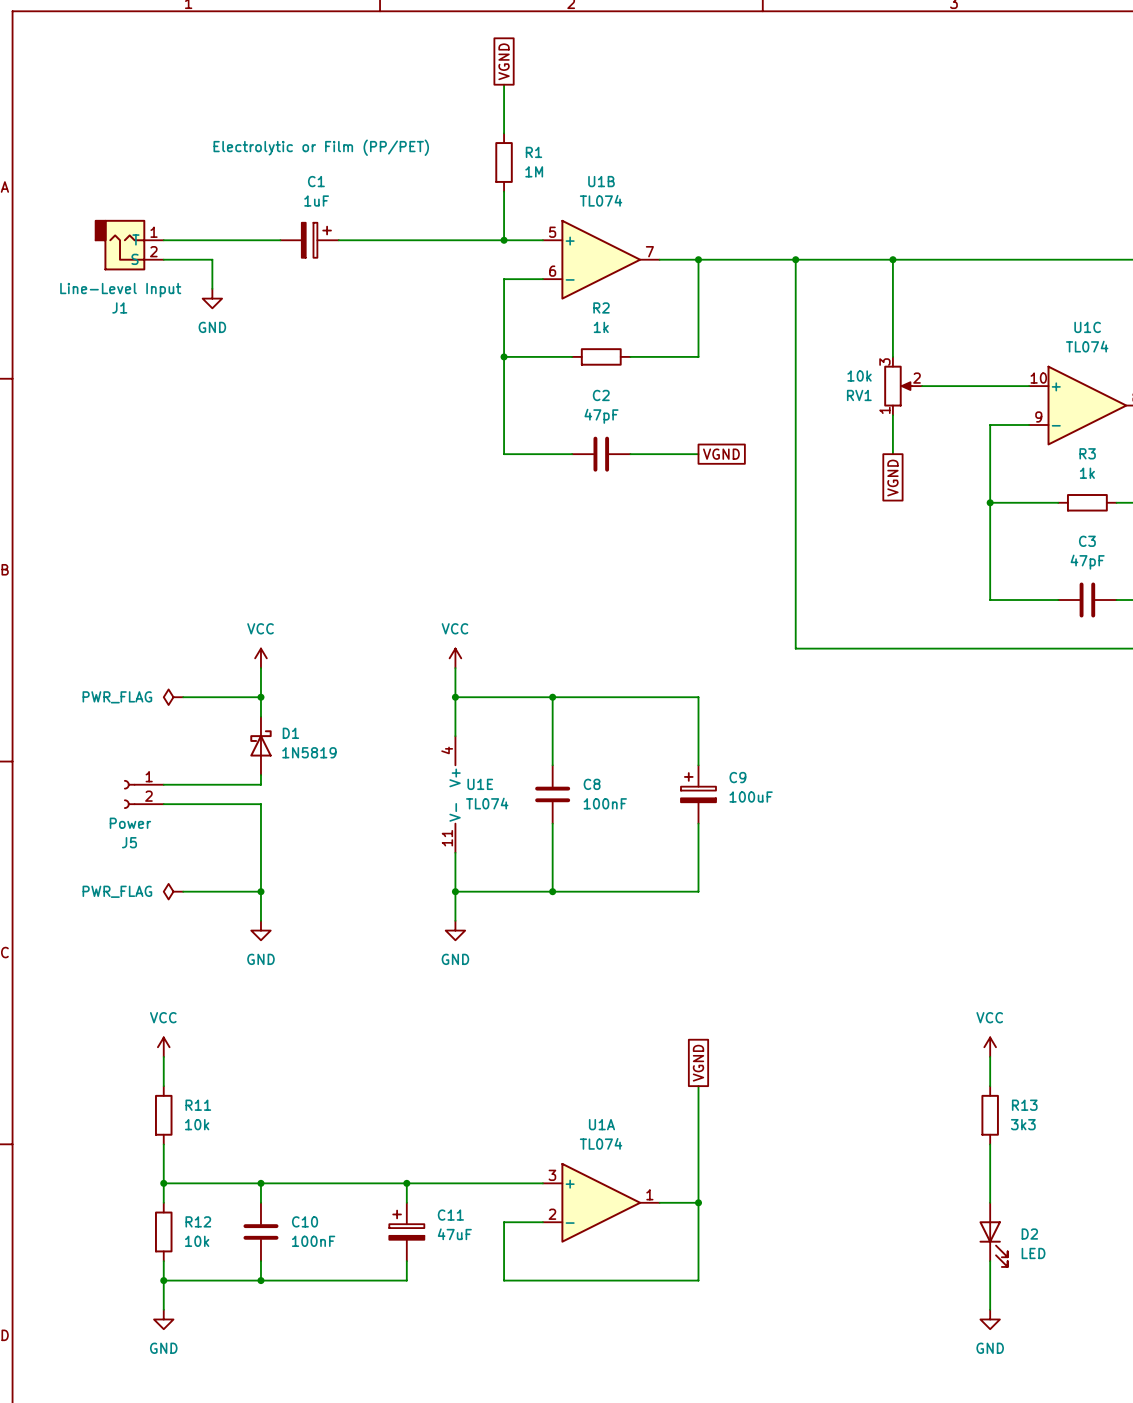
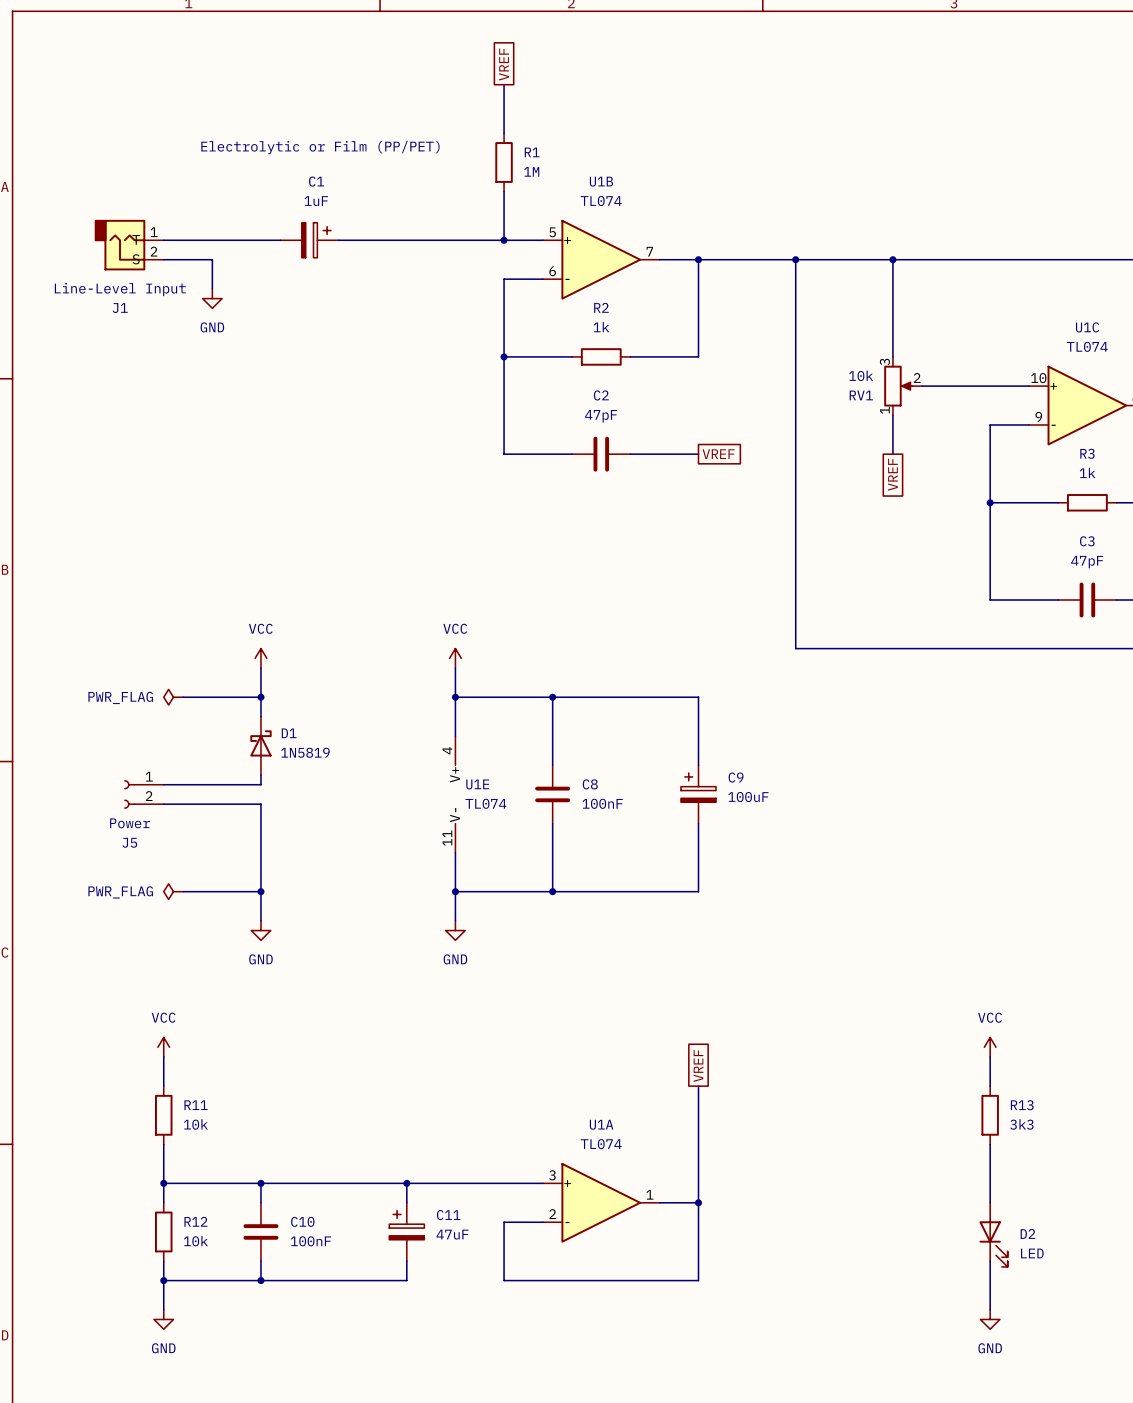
global label: VGND (504, 61) -> VREF (504, 64)
global label: VGND (721, 454) -> VREF (718, 454)
global label: VGND (892, 478) -> VREF (892, 474)
global label: VGND (698, 1063) -> VREF (698, 1066)

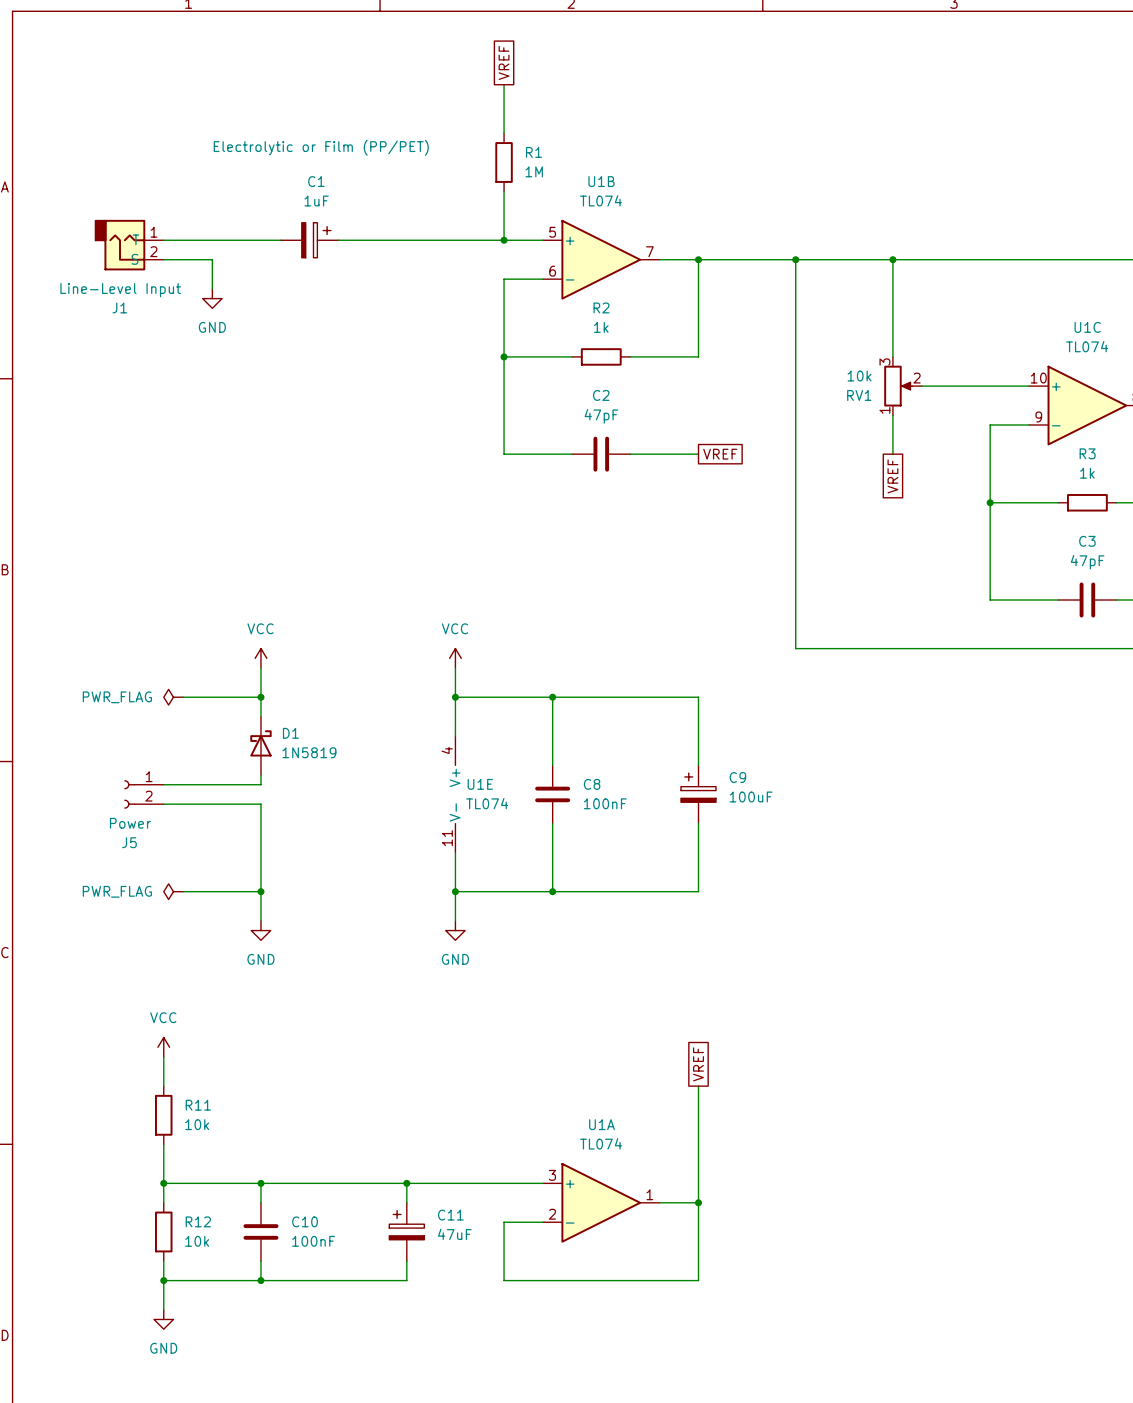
power symbol: VCC (990, 1047) -> none
wire: (990, 1056) (990, 1086) -> none
R13: 3k3 (990, 1115) -> none
wire: (990, 1144) (990, 1202) -> none
D2: LED (993, 1234) -> none
wire: (990, 1261) (990, 1309) -> none
power symbol: GND (990, 1319) -> none

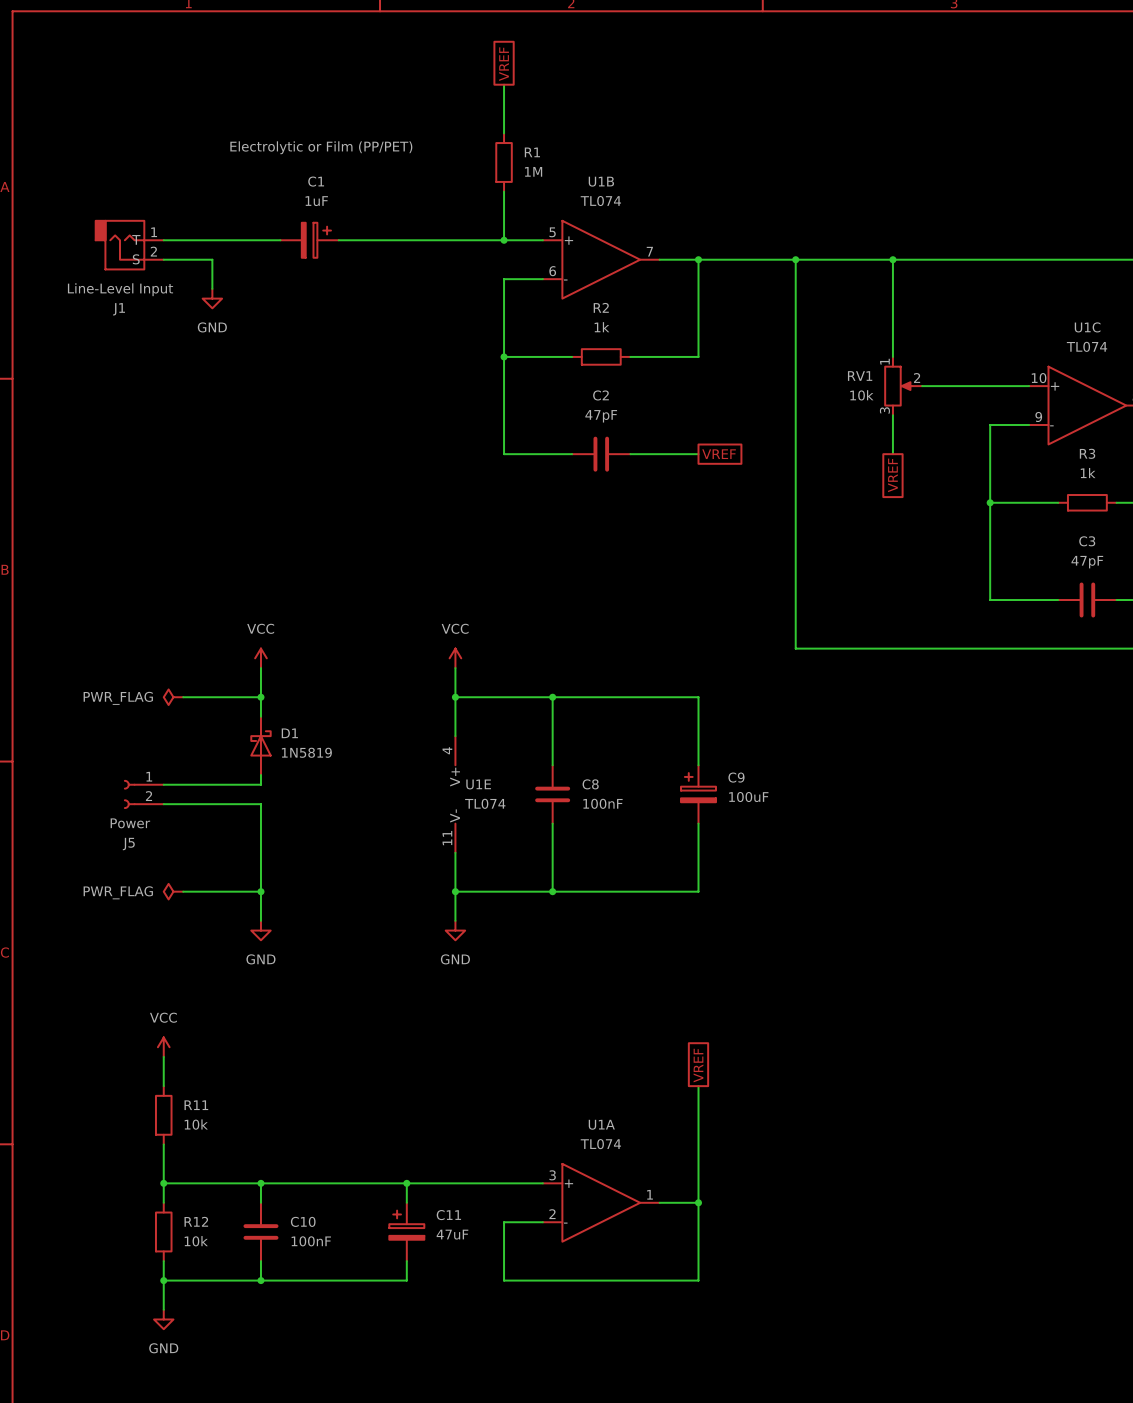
RV1 flip: as is (898, 386) -> up-down (898, 386)

